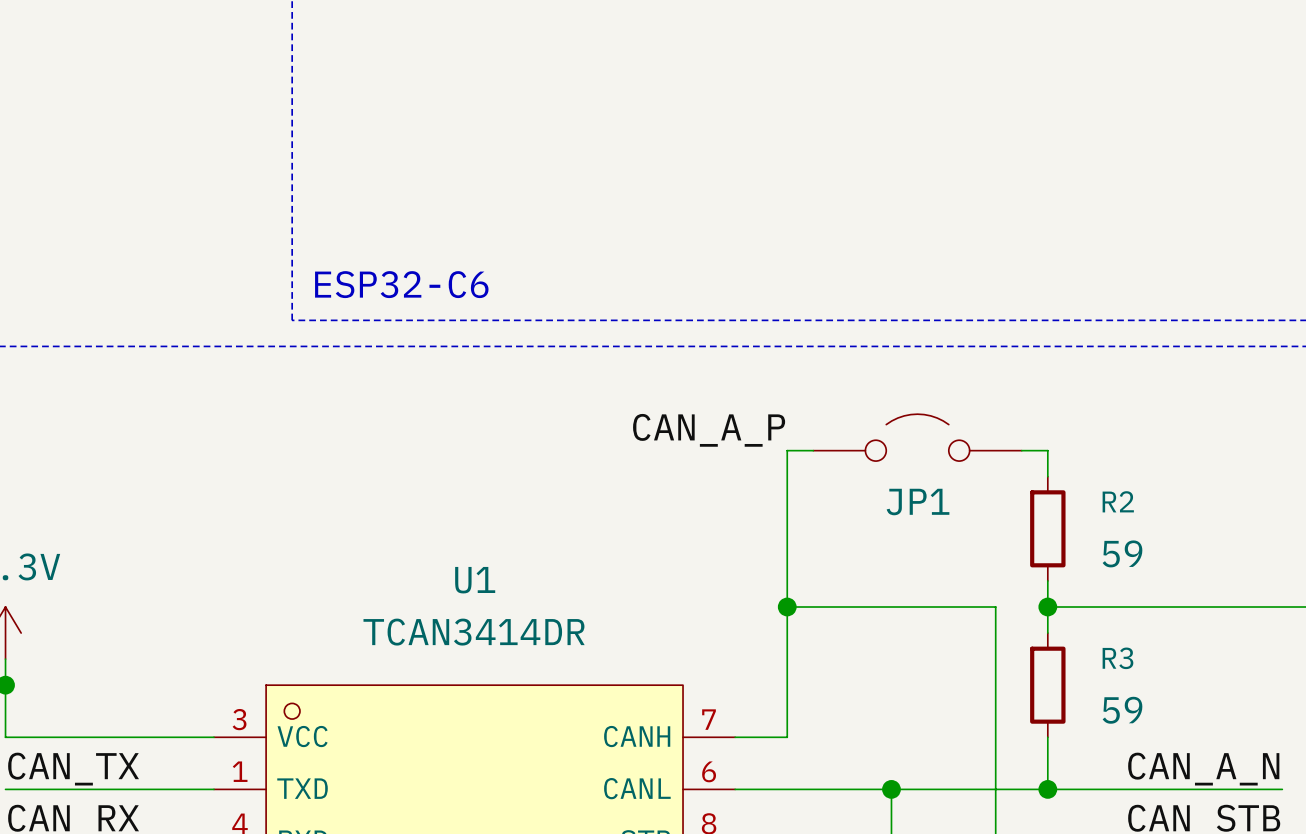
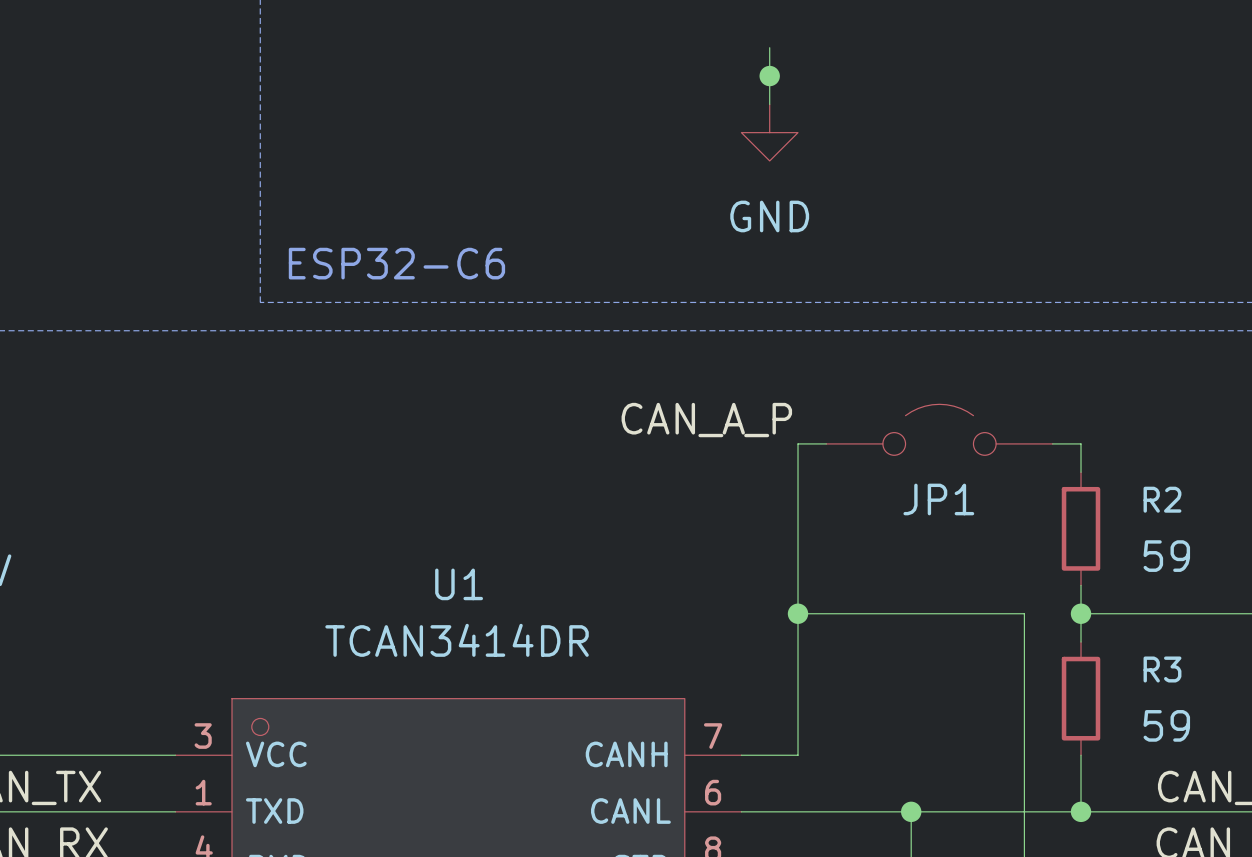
wire: none -> (769, 47) (769, 104)
junction: none -> (769, 76)
power symbol: none -> GND (769, 132)

